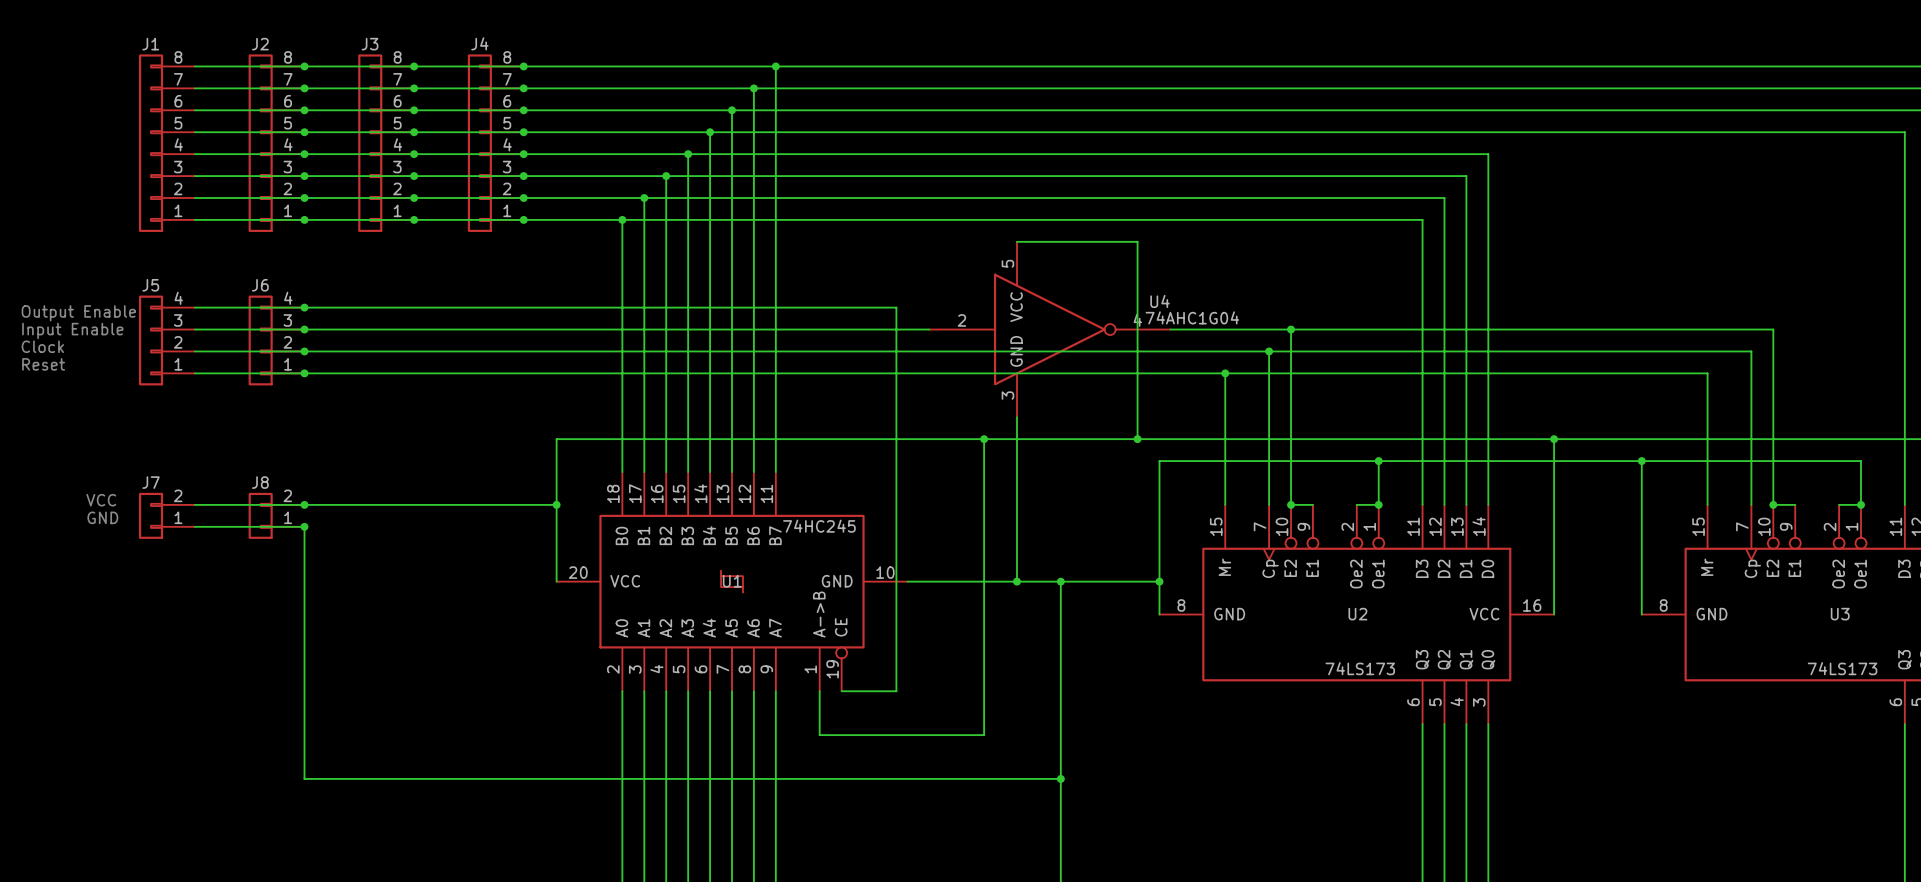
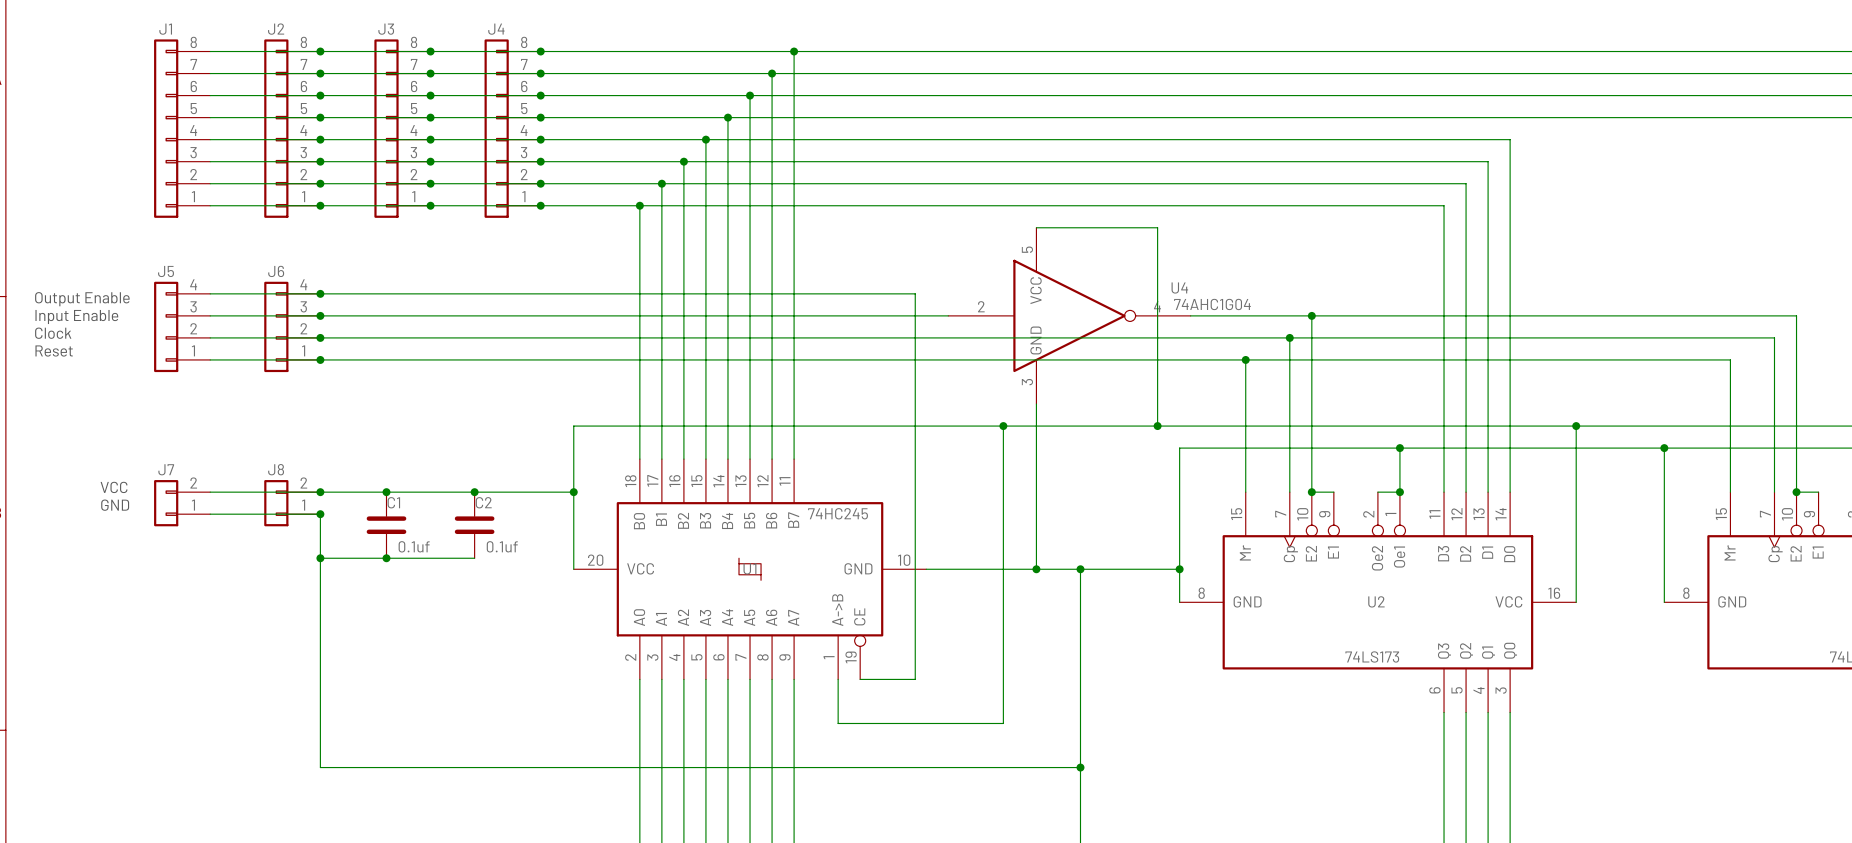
junction: none -> (386, 492)
junction: none -> (474, 492)
C1: none -> 0.1uf (386, 525)
C2: none -> 0.1uf (474, 525)
wire: none -> (320, 558) (474, 558)
junction: none -> (320, 558)
junction: none -> (386, 558)

